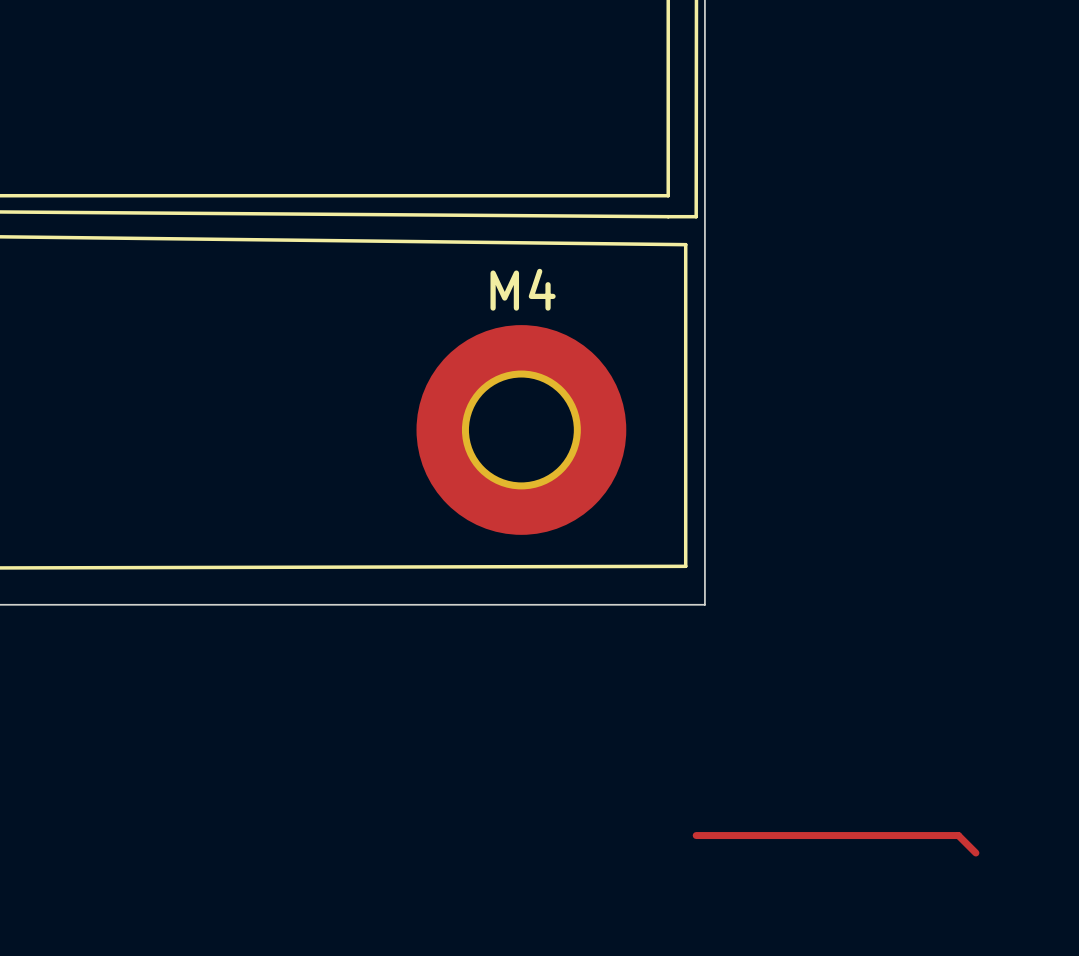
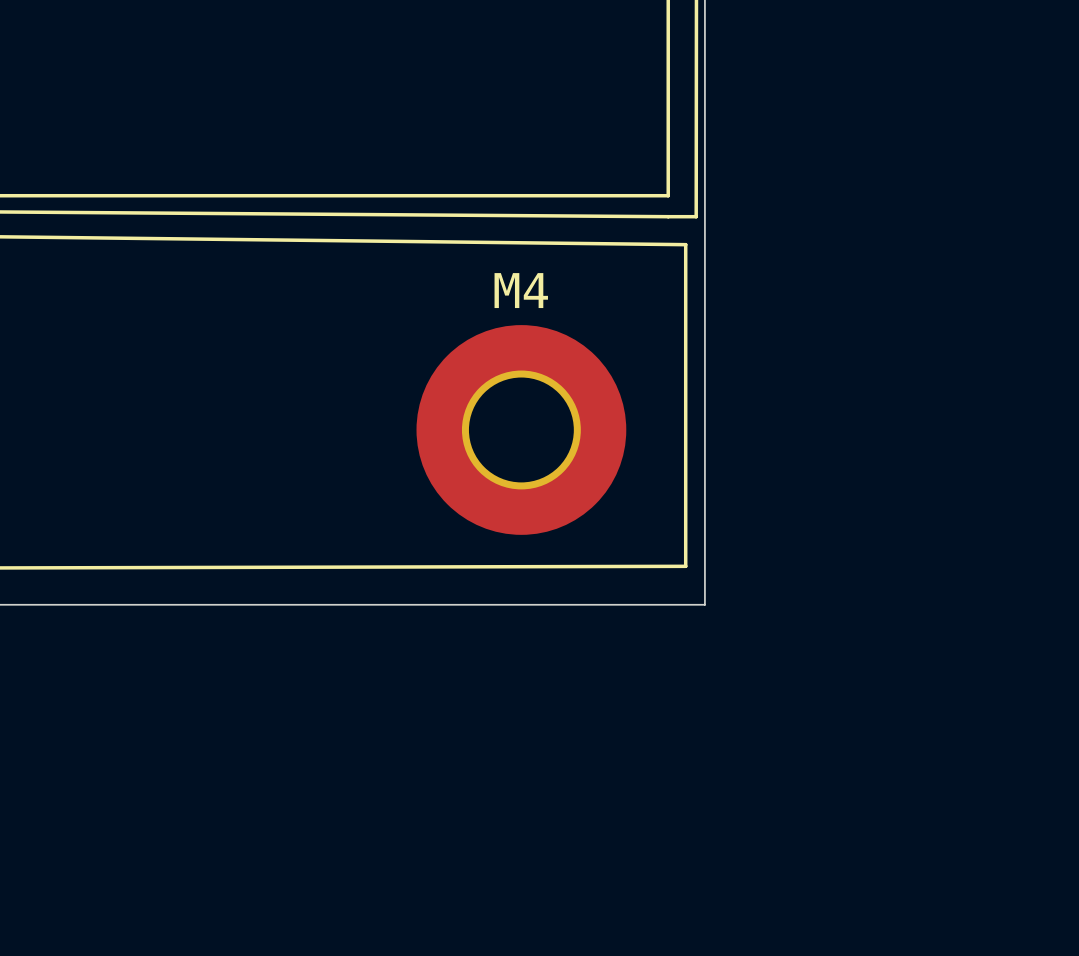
track: (696, 835) (958, 835) (975, 853) -> none

